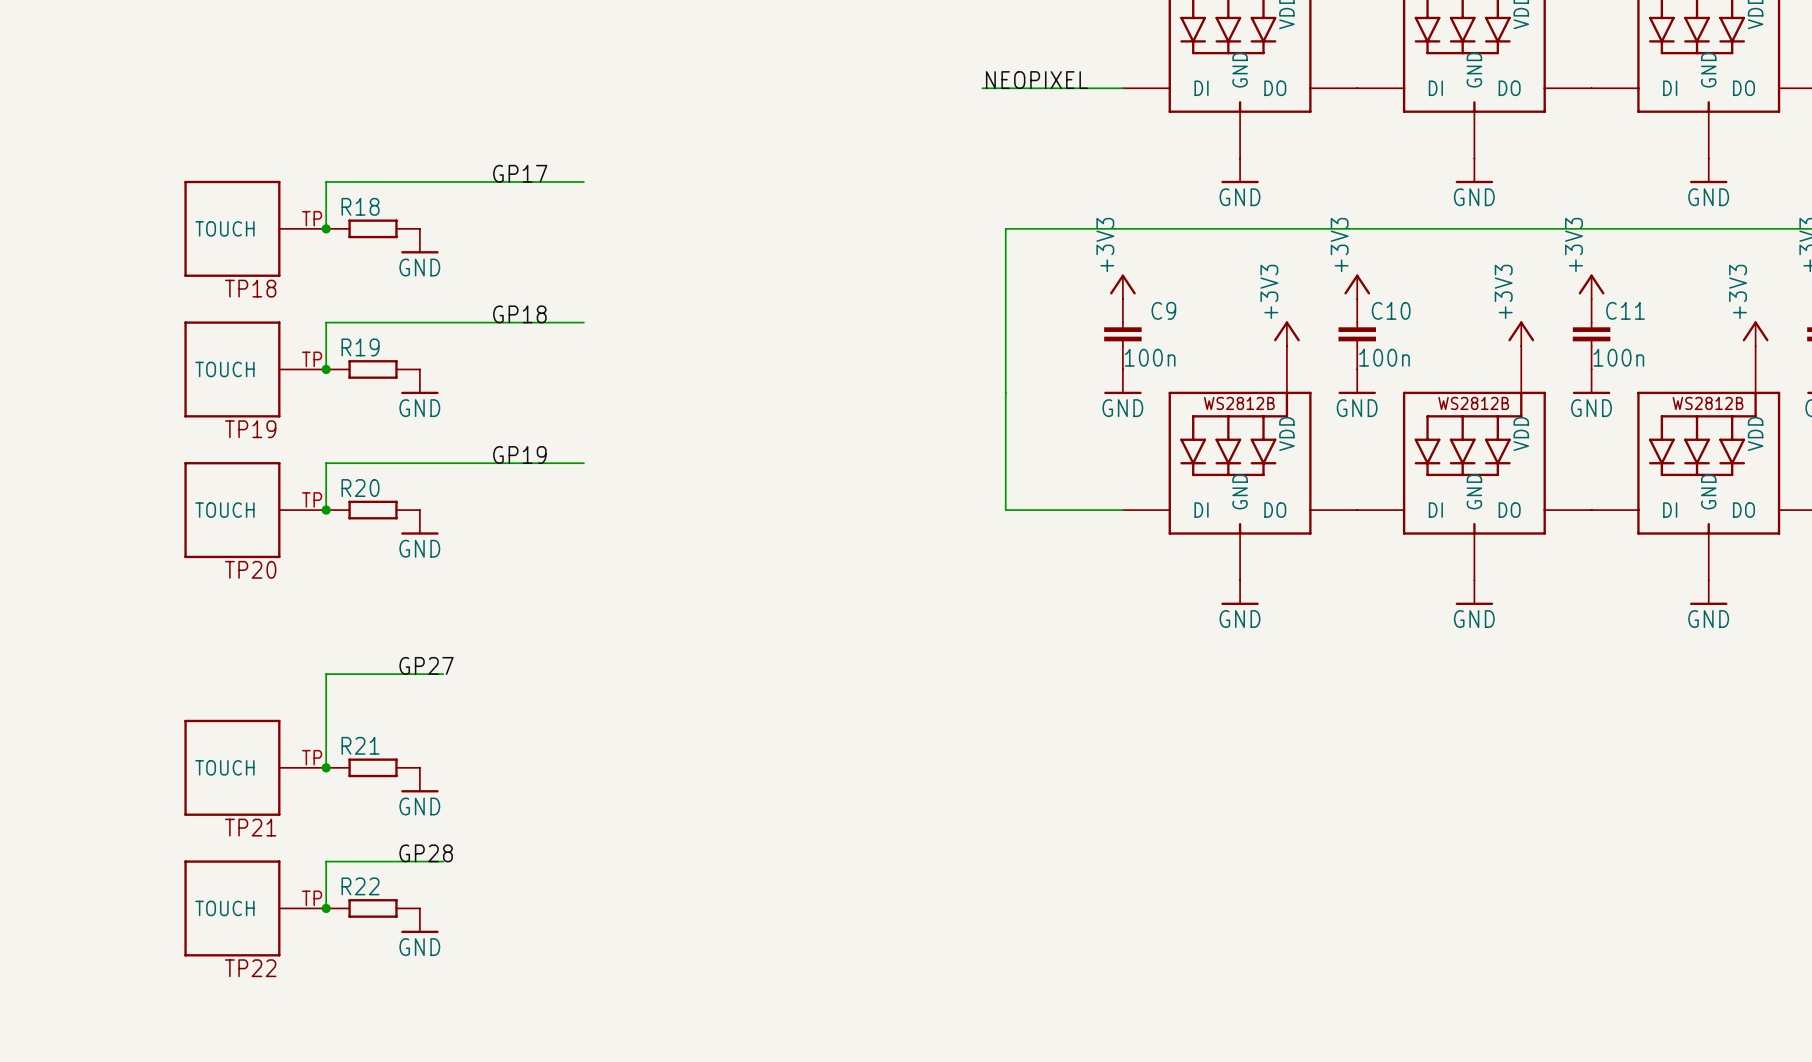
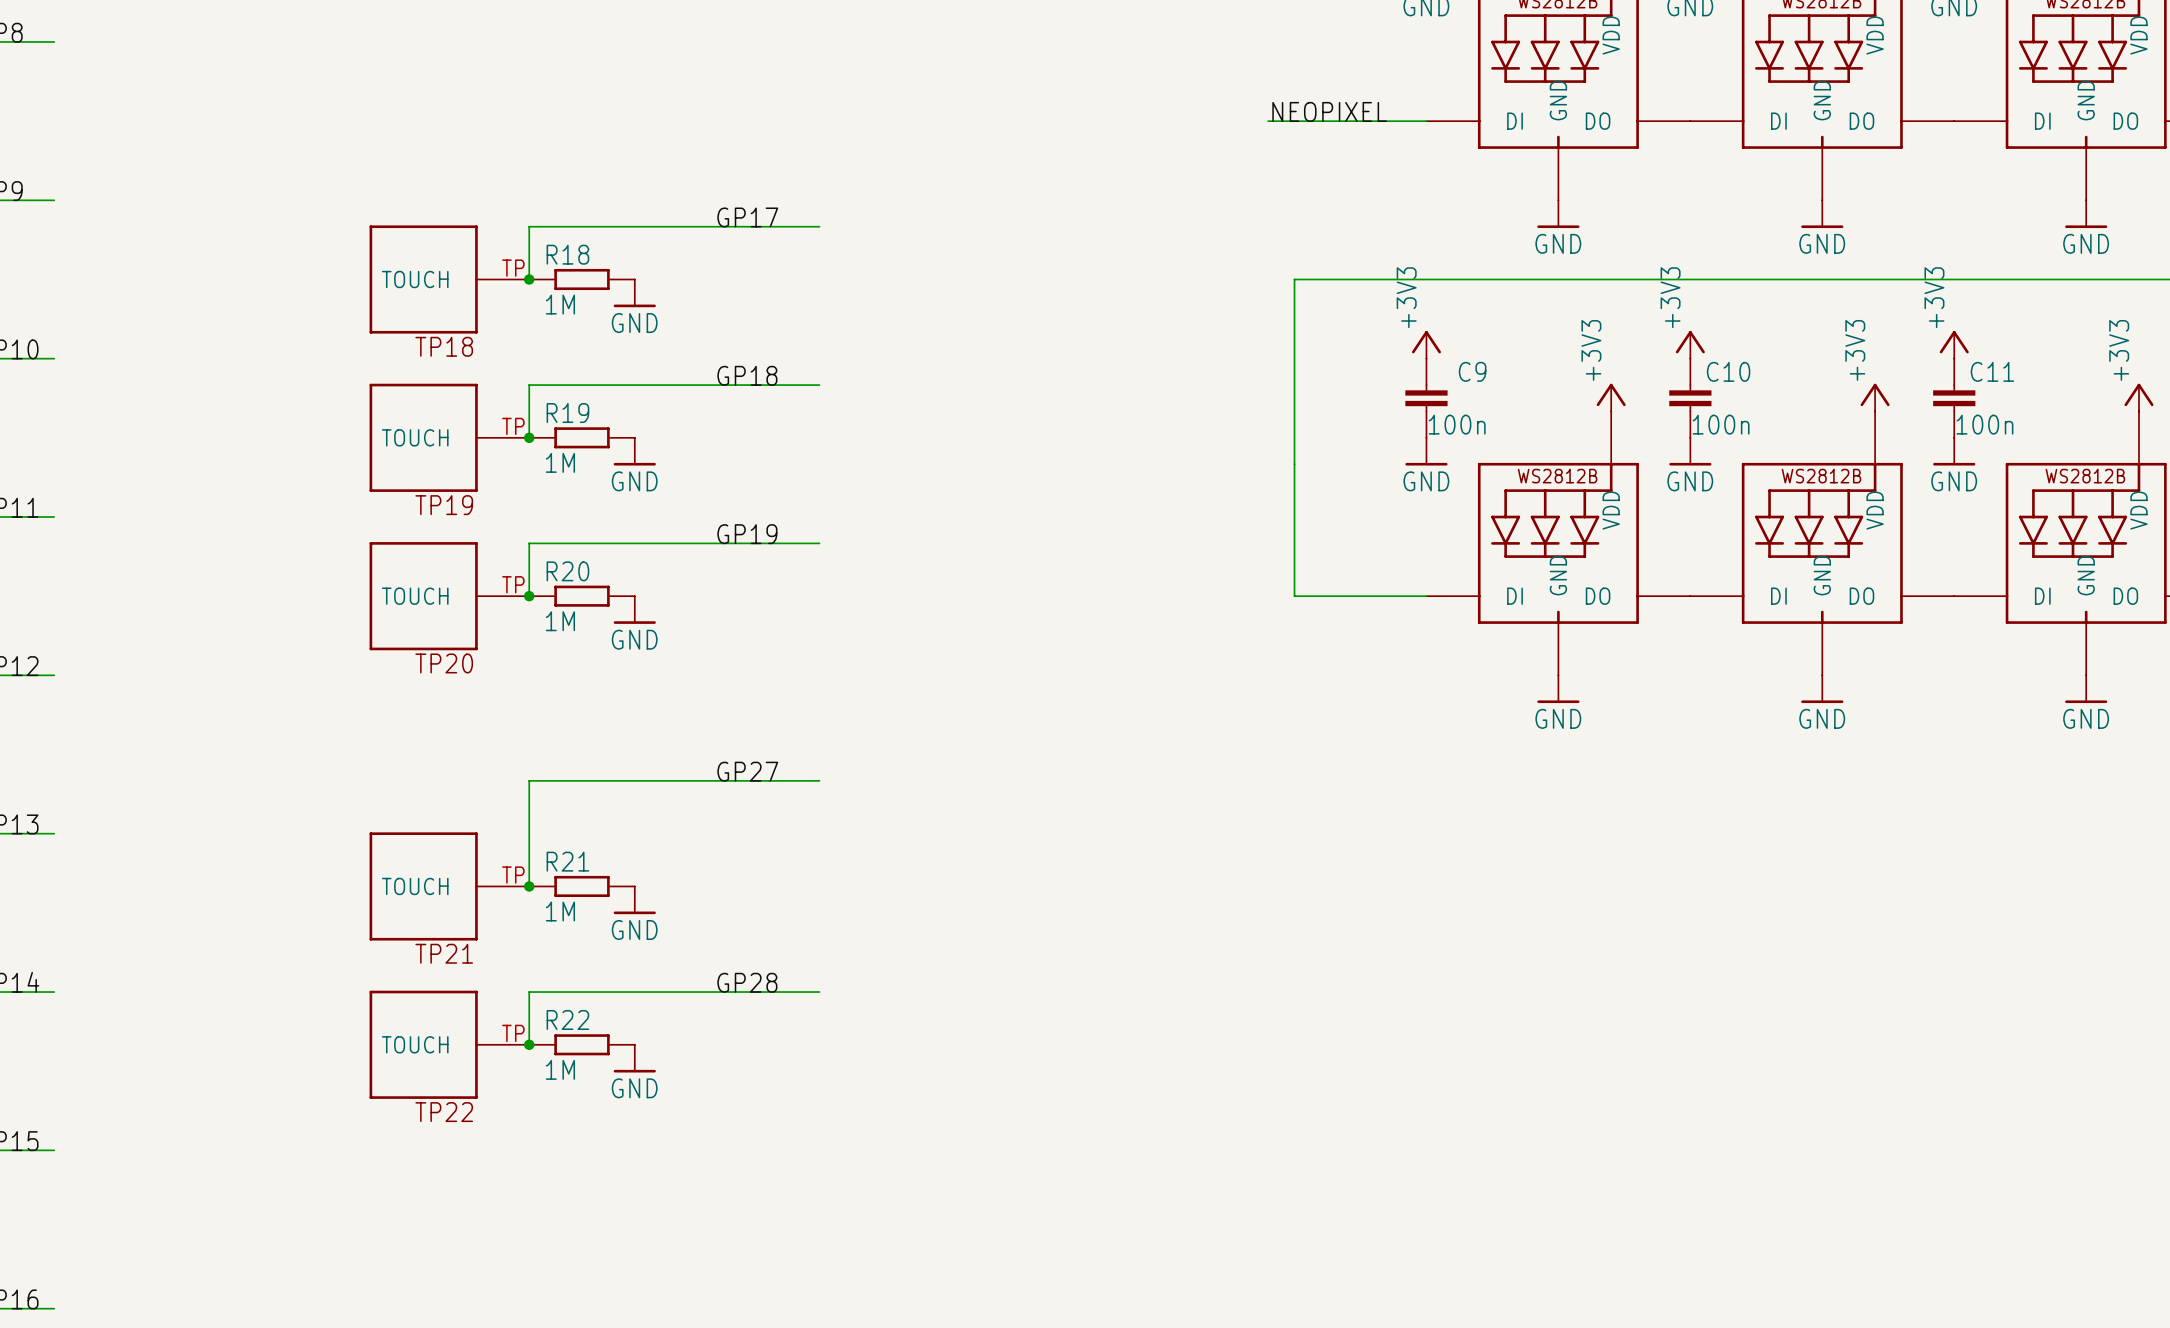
R18 value: none -> 1M (560, 304)
R19 value: none -> 1M (560, 462)
R20 value: none -> 1M (560, 621)
label position: GP27 (426, 665) -> GP27 (747, 771)
wire: none -> (661, 780) (819, 780)
R21 value: none -> 1M (560, 911)
label position: GP28 (426, 853) -> GP28 (747, 982)
wire: none -> (661, 992) (819, 992)
R22 value: none -> 1M (560, 1069)

